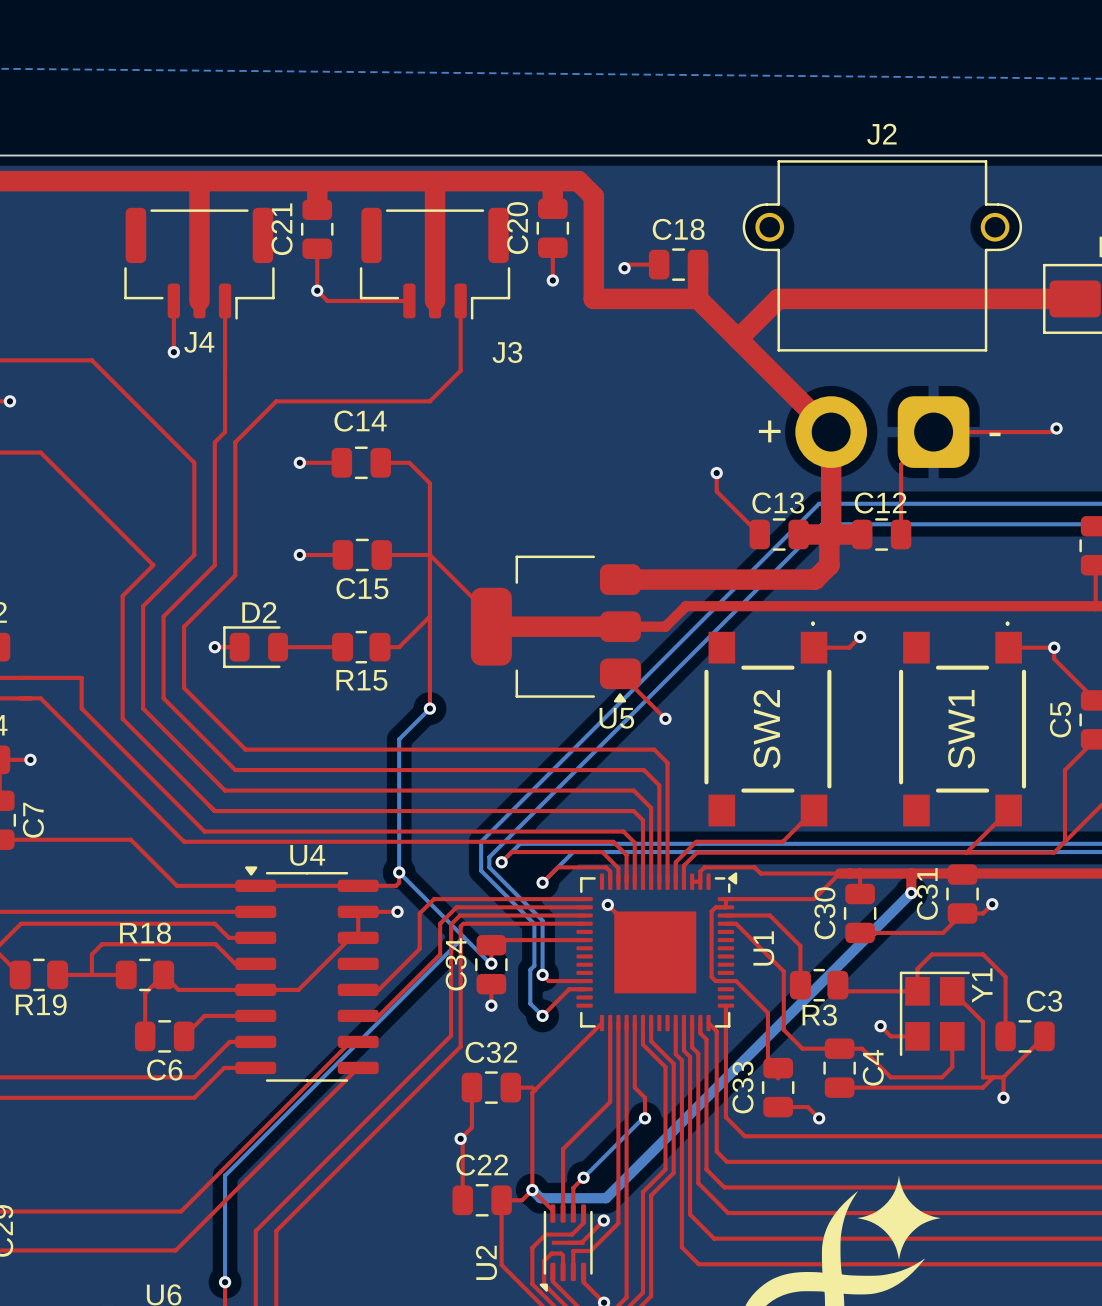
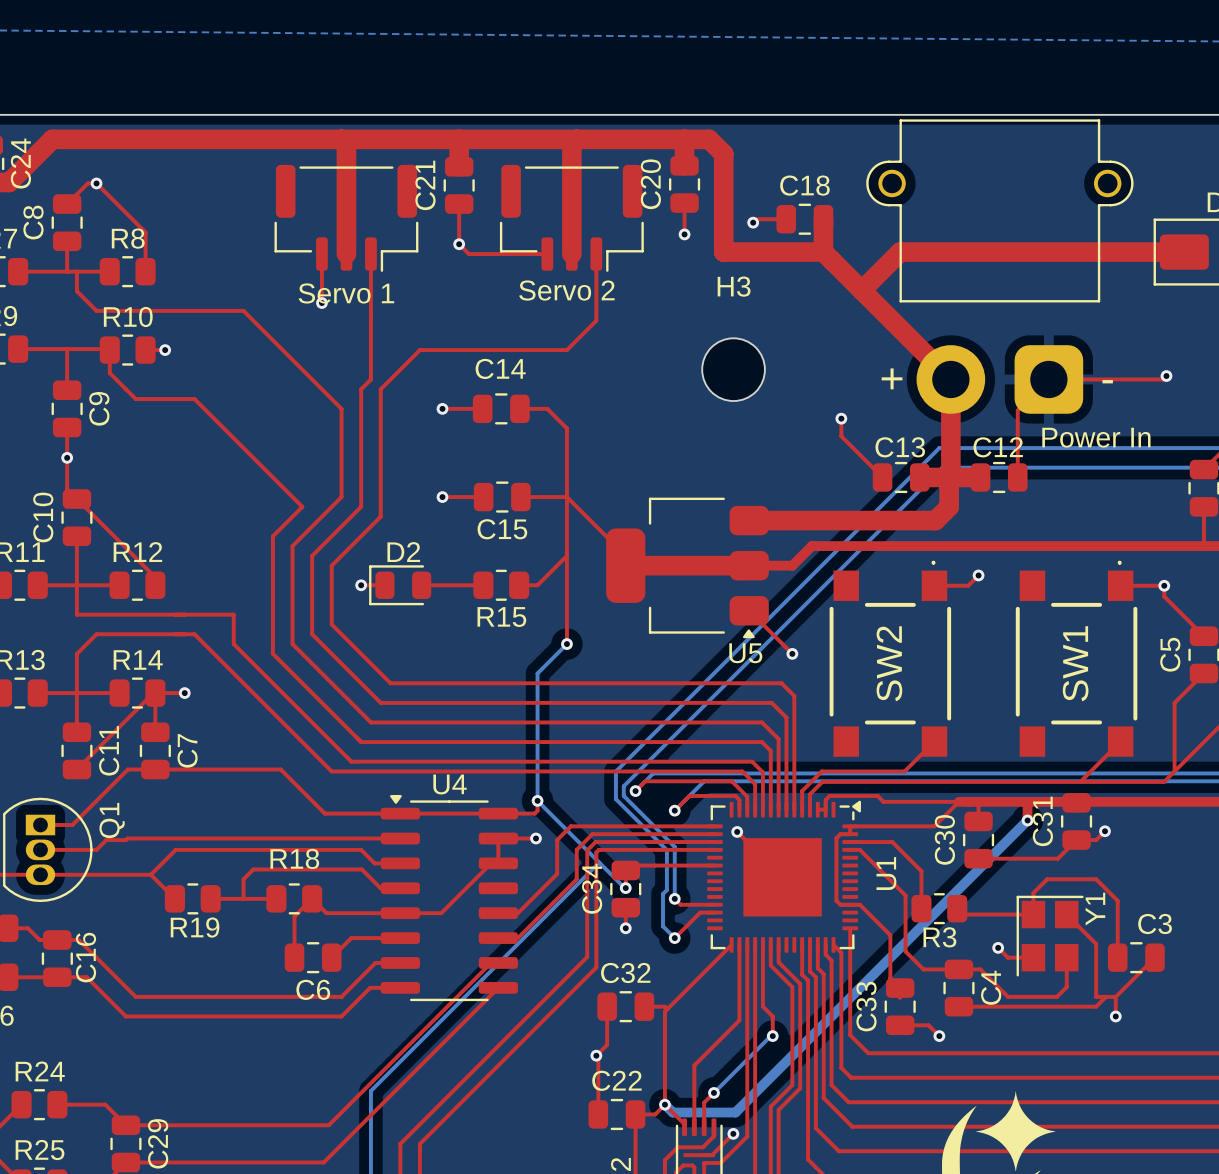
J2 name: J2 (881, 134) -> Power In (1096, 437)
J4 name: J4 (199, 342) -> Servo 1 (346, 293)
J3 name: J3 (507, 352) -> Servo 2 (566, 290)
H3: none -> (733, 369)

